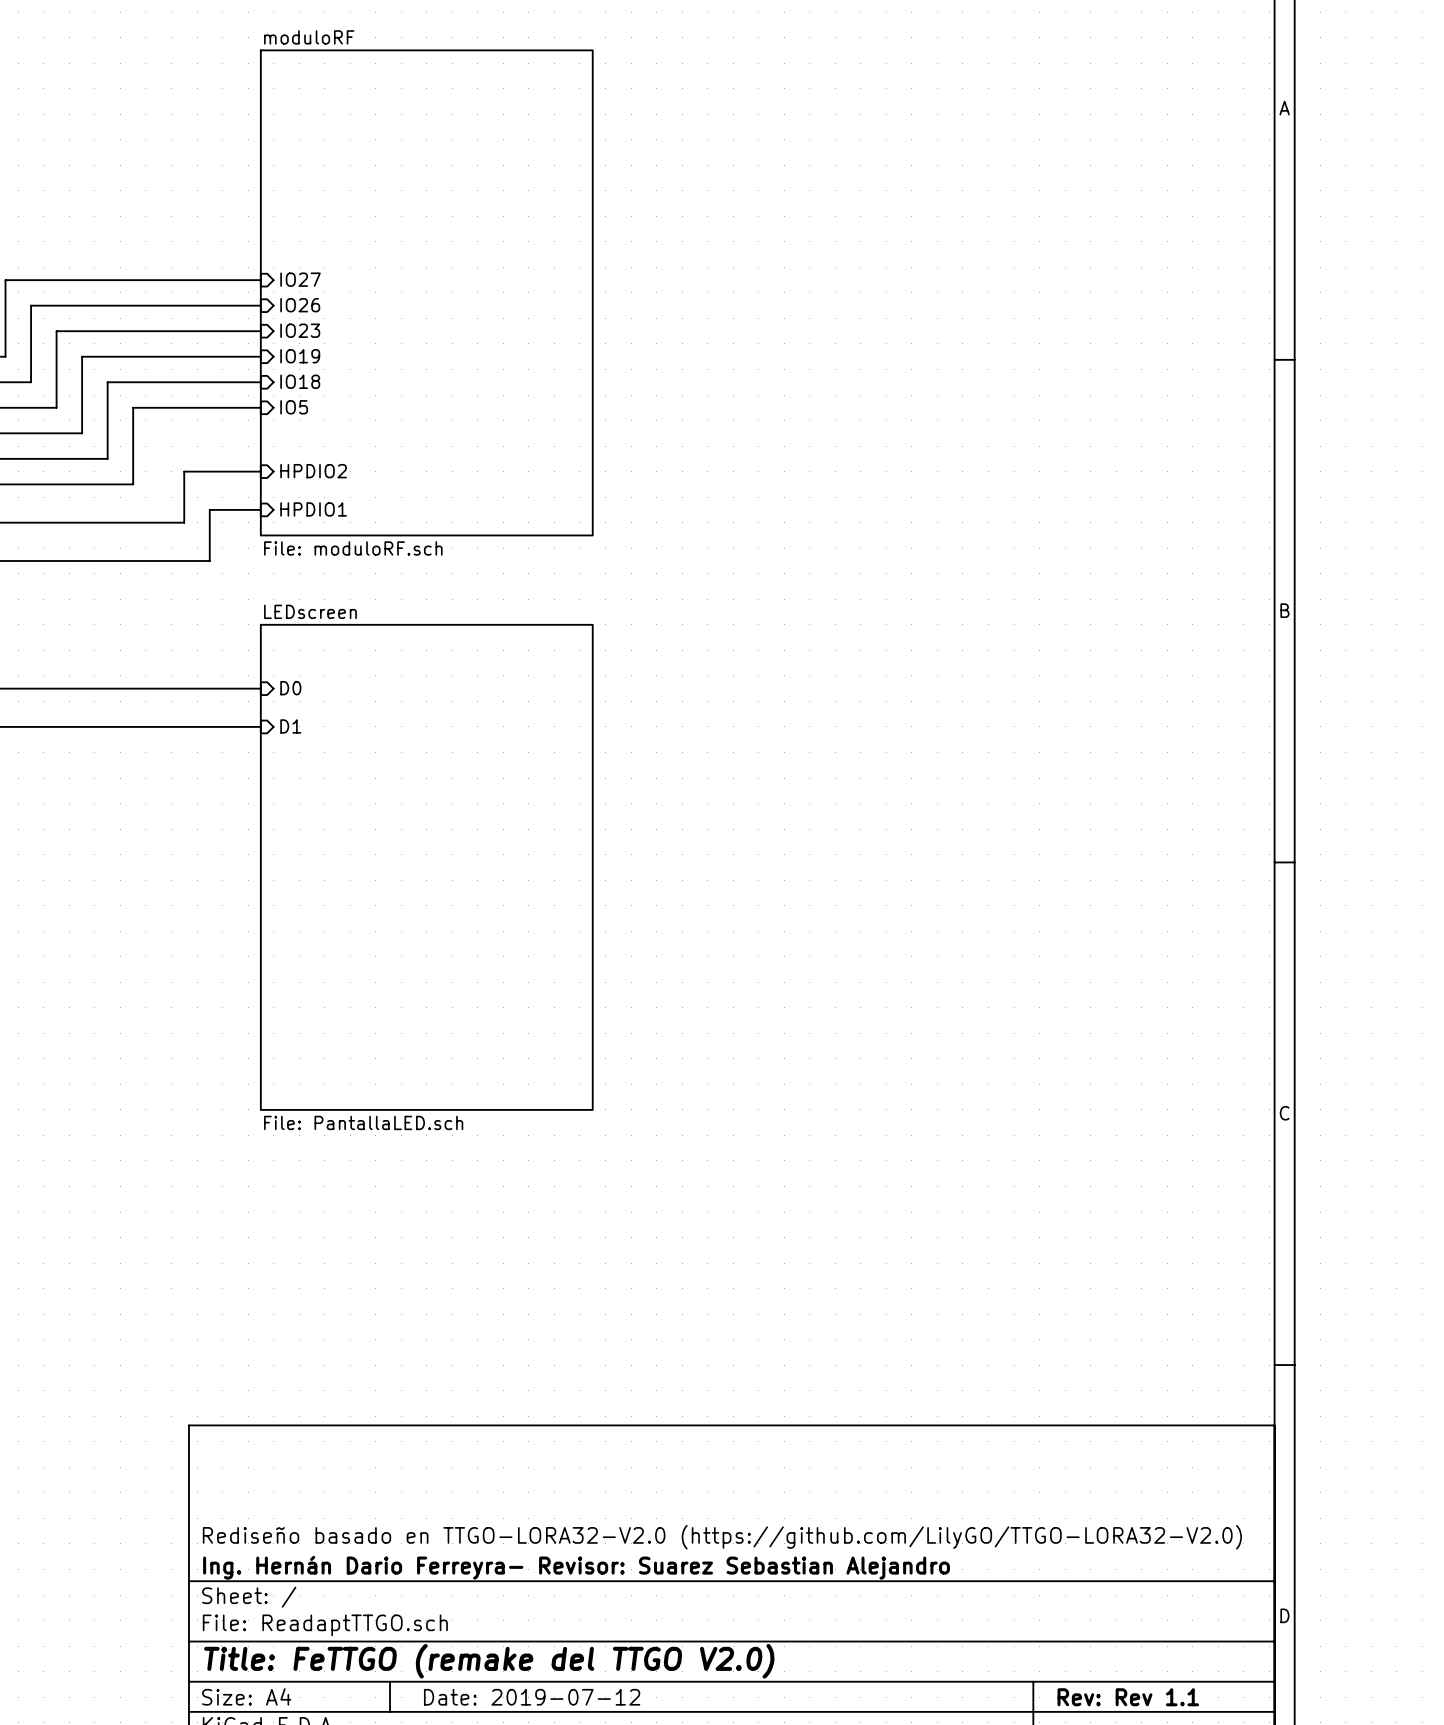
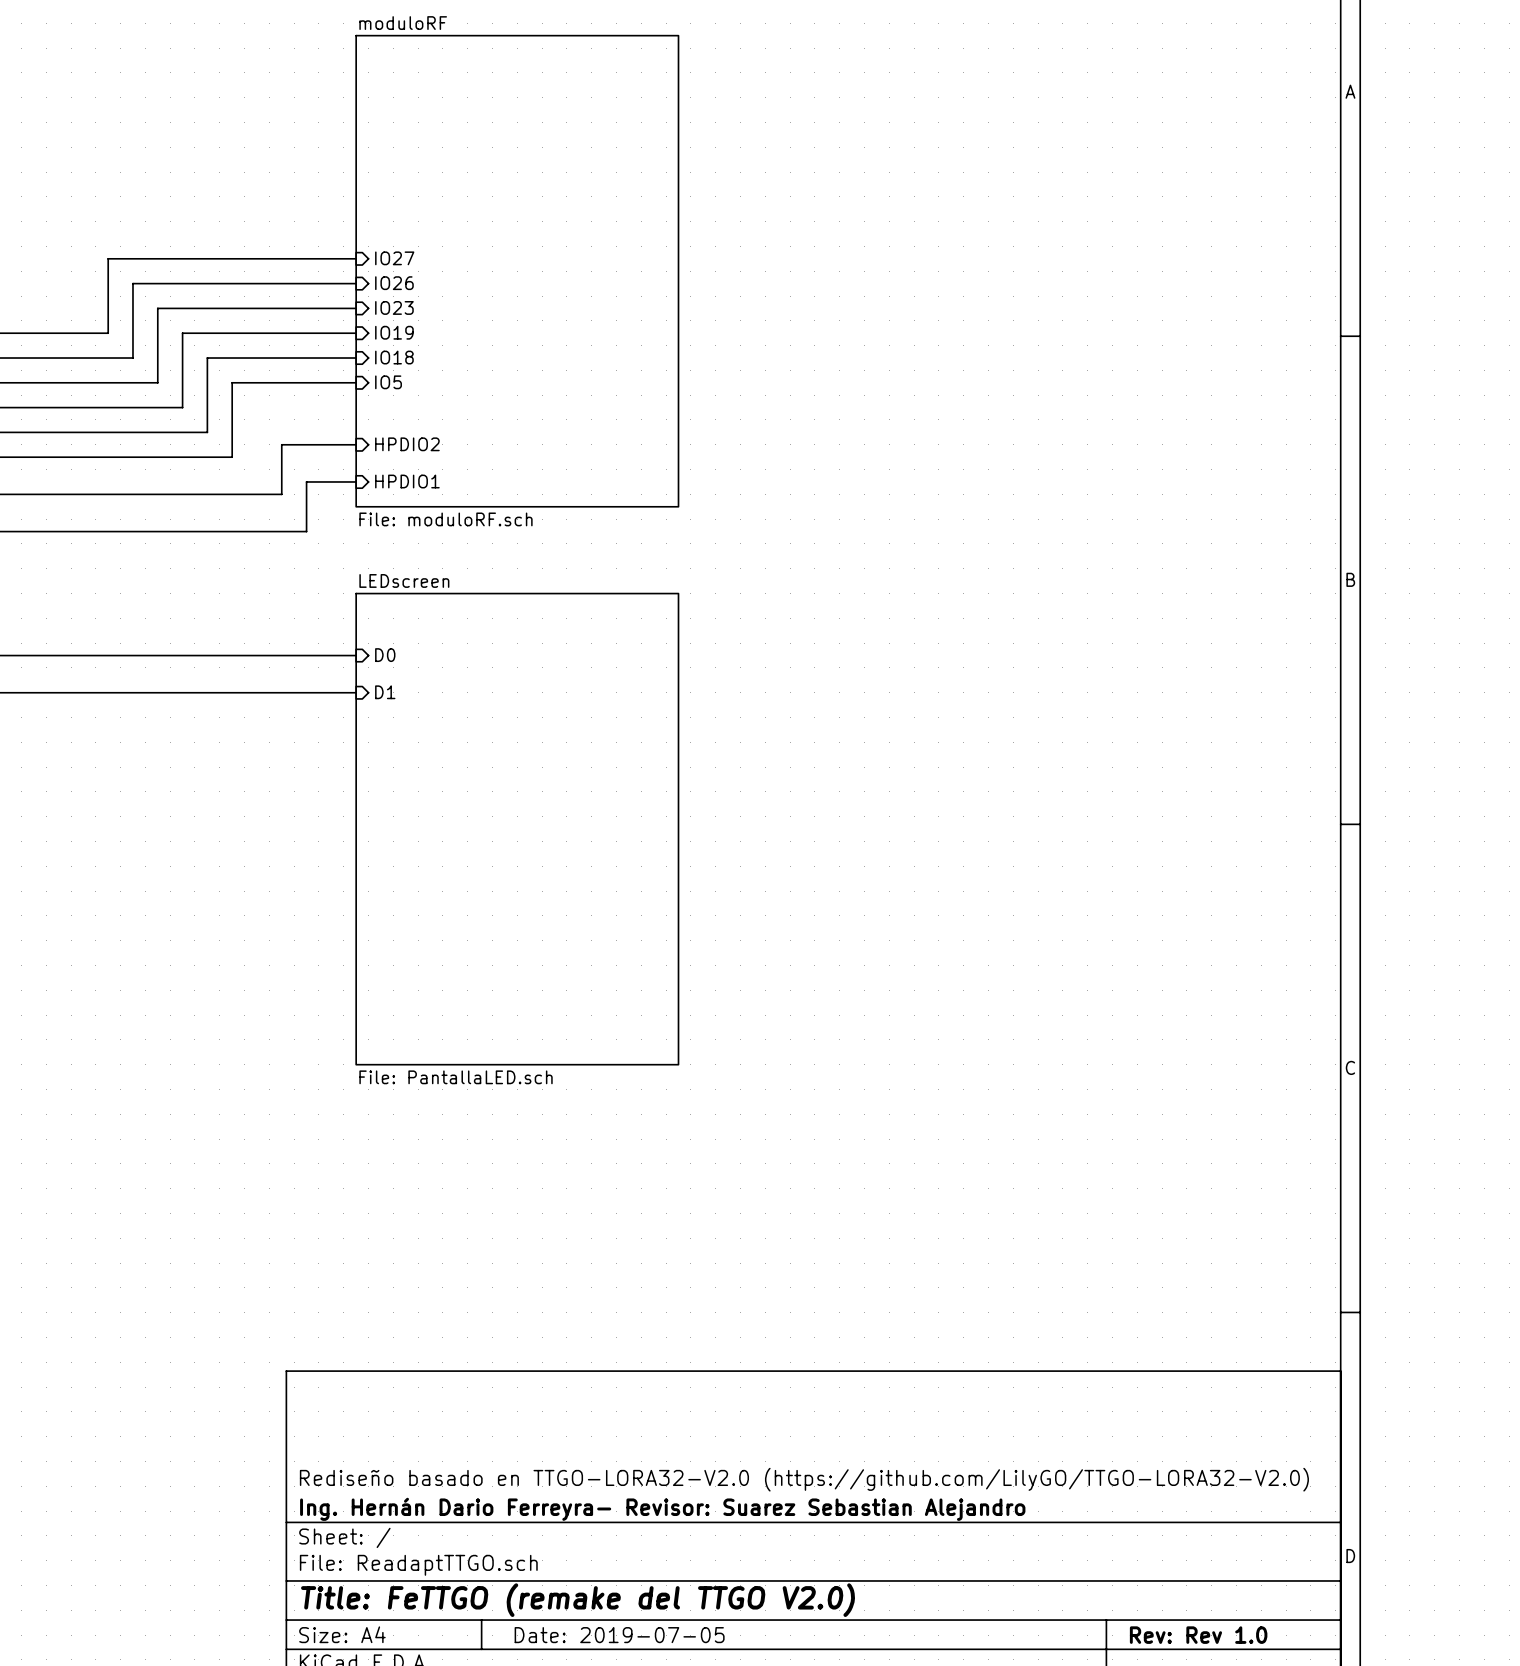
title block: Date: 2019-07-12 (532, 1697) -> Date: 2019-07-05 (619, 1635)
title block: Rev: Rev 1.1 (1128, 1697) -> Rev: Rev 1.0 (1198, 1635)

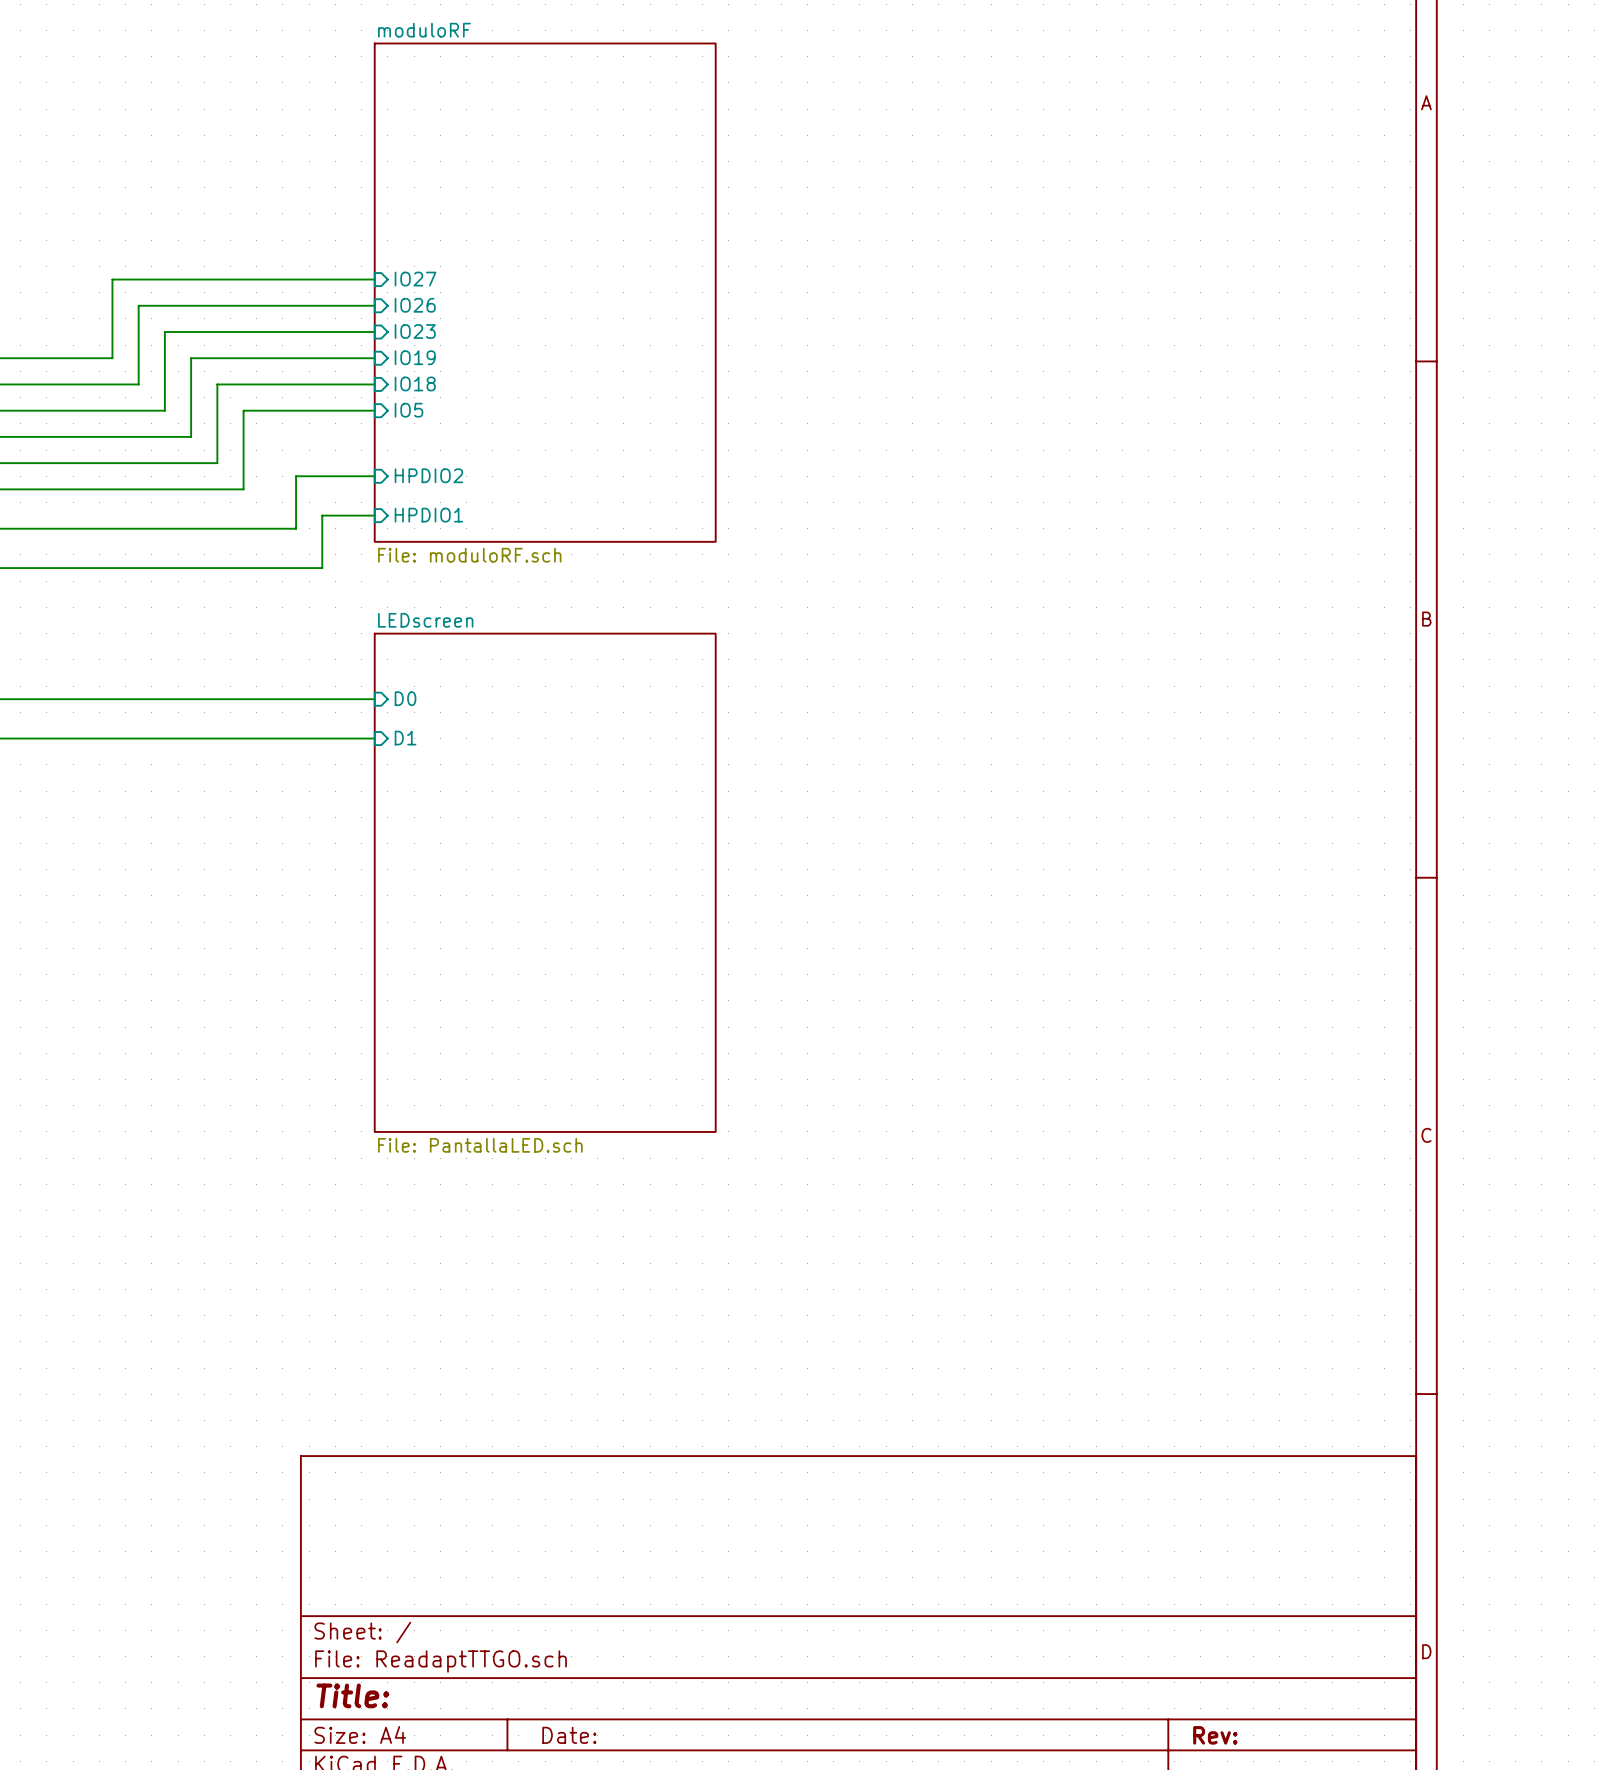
title block: Rediseño basado en TTGO-LORA32-V2.0 (https://github.com/LilyGO/TTGO-LORA32-V2.0) (804, 1479) -> none
title block: Ing. Hernán Dario Ferreyra- Revisor: Suarez Sebastian Alejandro (662, 1509) -> none
title block: Title: FeTTGO (remake del TTGO V2.0) (578, 1600) -> Title: (352, 1695)
title block: Date: 2019-07-05 (619, 1635) -> Date: (569, 1735)
title block: Rev: Rev 1.0 (1198, 1635) -> Rev: (1215, 1735)

